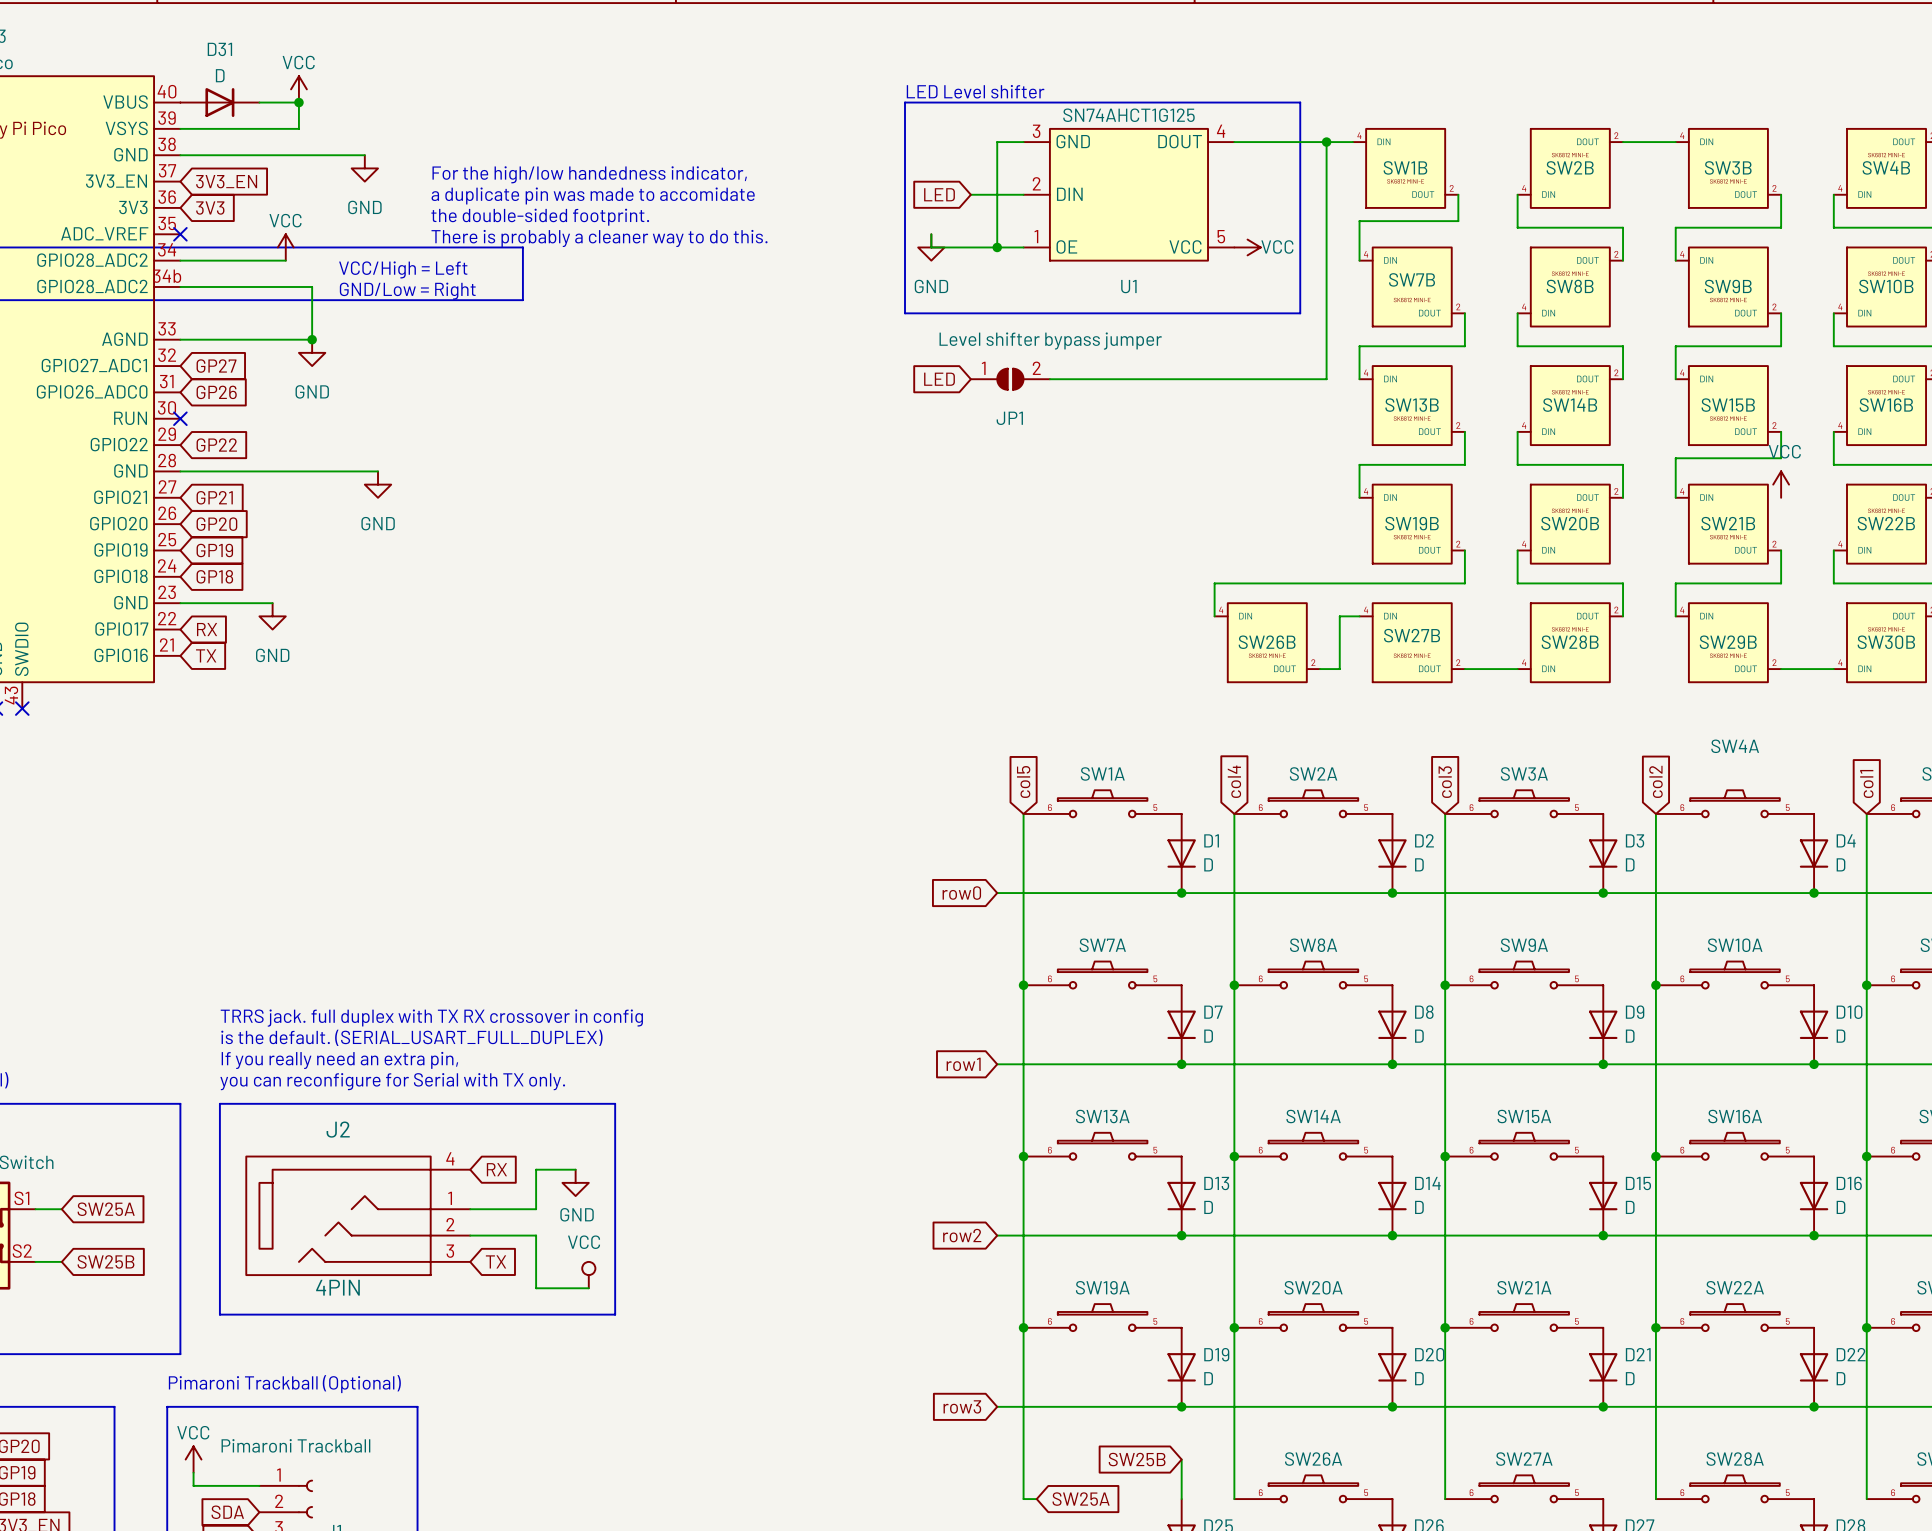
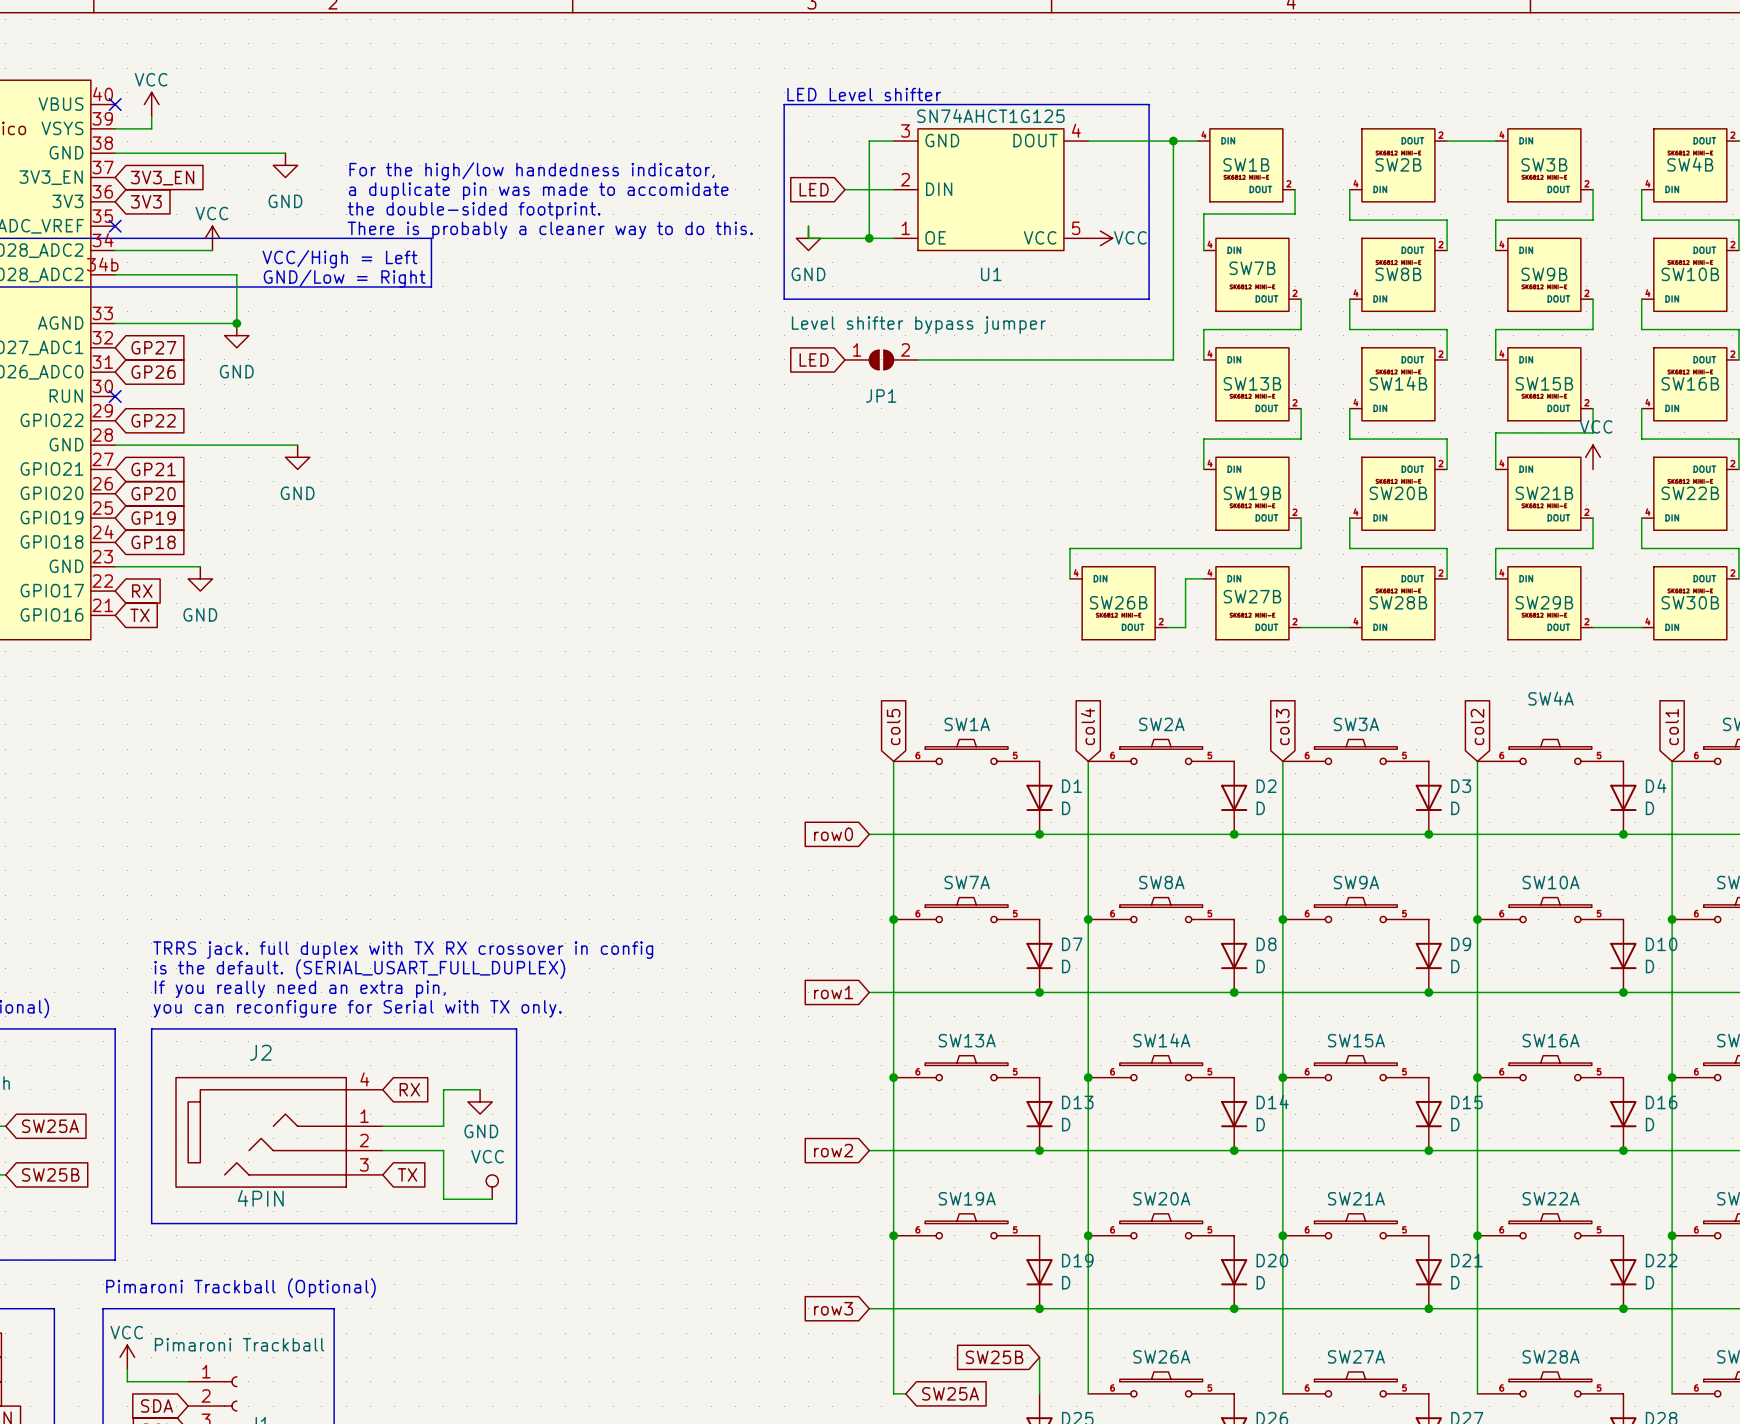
power symbol position: VCC (298, 89) -> VCC (151, 104)
no-connect mark: none -> (115, 104)
D31: D (219, 102) -> none
wire: (259, 102) (298, 102) (298, 128) (219, 128) -> (151, 116) (151, 128)
junction: (298, 102) -> none

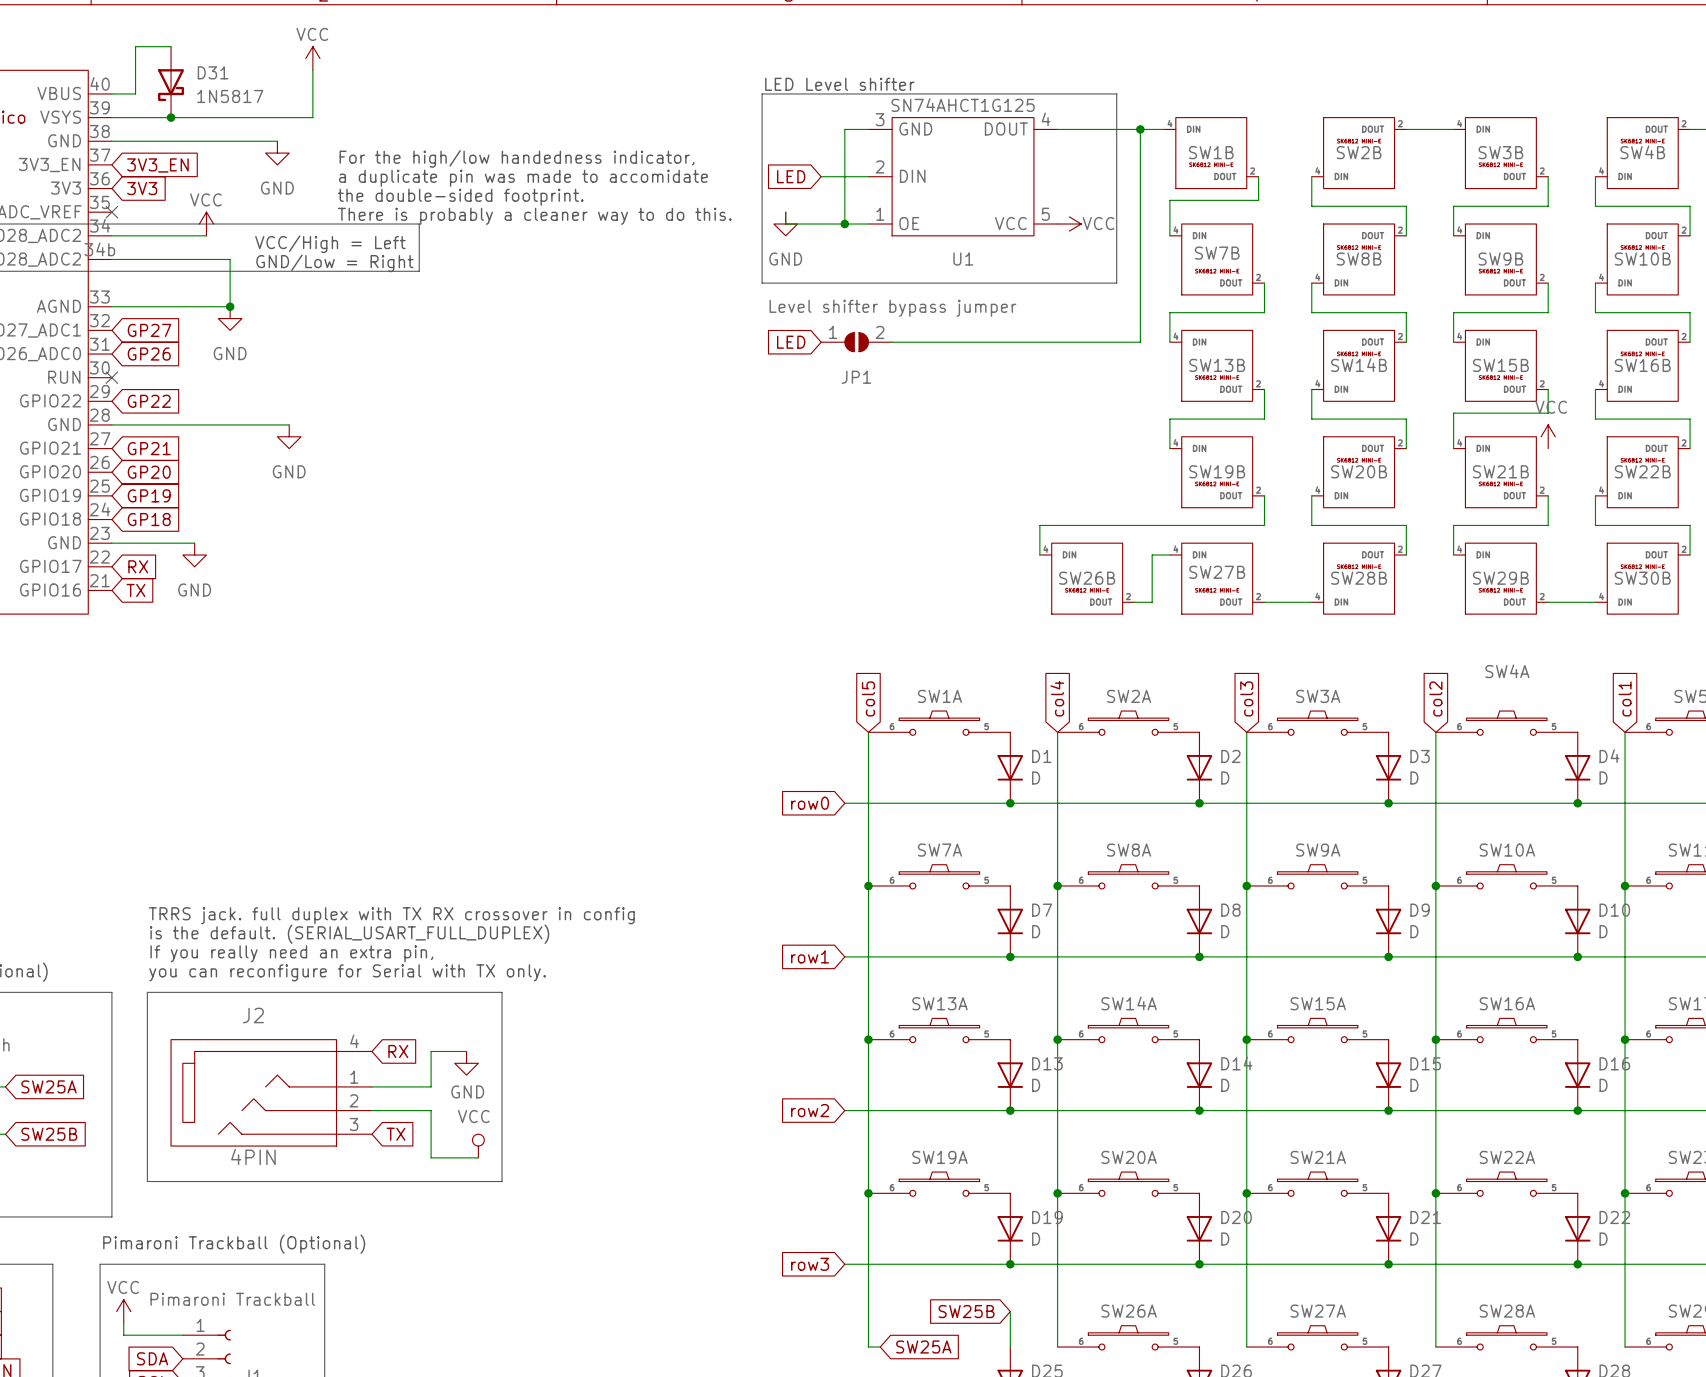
wire: none -> (171, 46) (135, 46) (135, 93) (111, 93)
D31: none -> 1N5817 (171, 82)
no-connect mark: (115, 104) -> none
power symbol position: VCC (151, 104) -> VCC (312, 58)
wire: (151, 116) (151, 128) -> (312, 70) (312, 117) (147, 117)
junction: none -> (171, 117)

